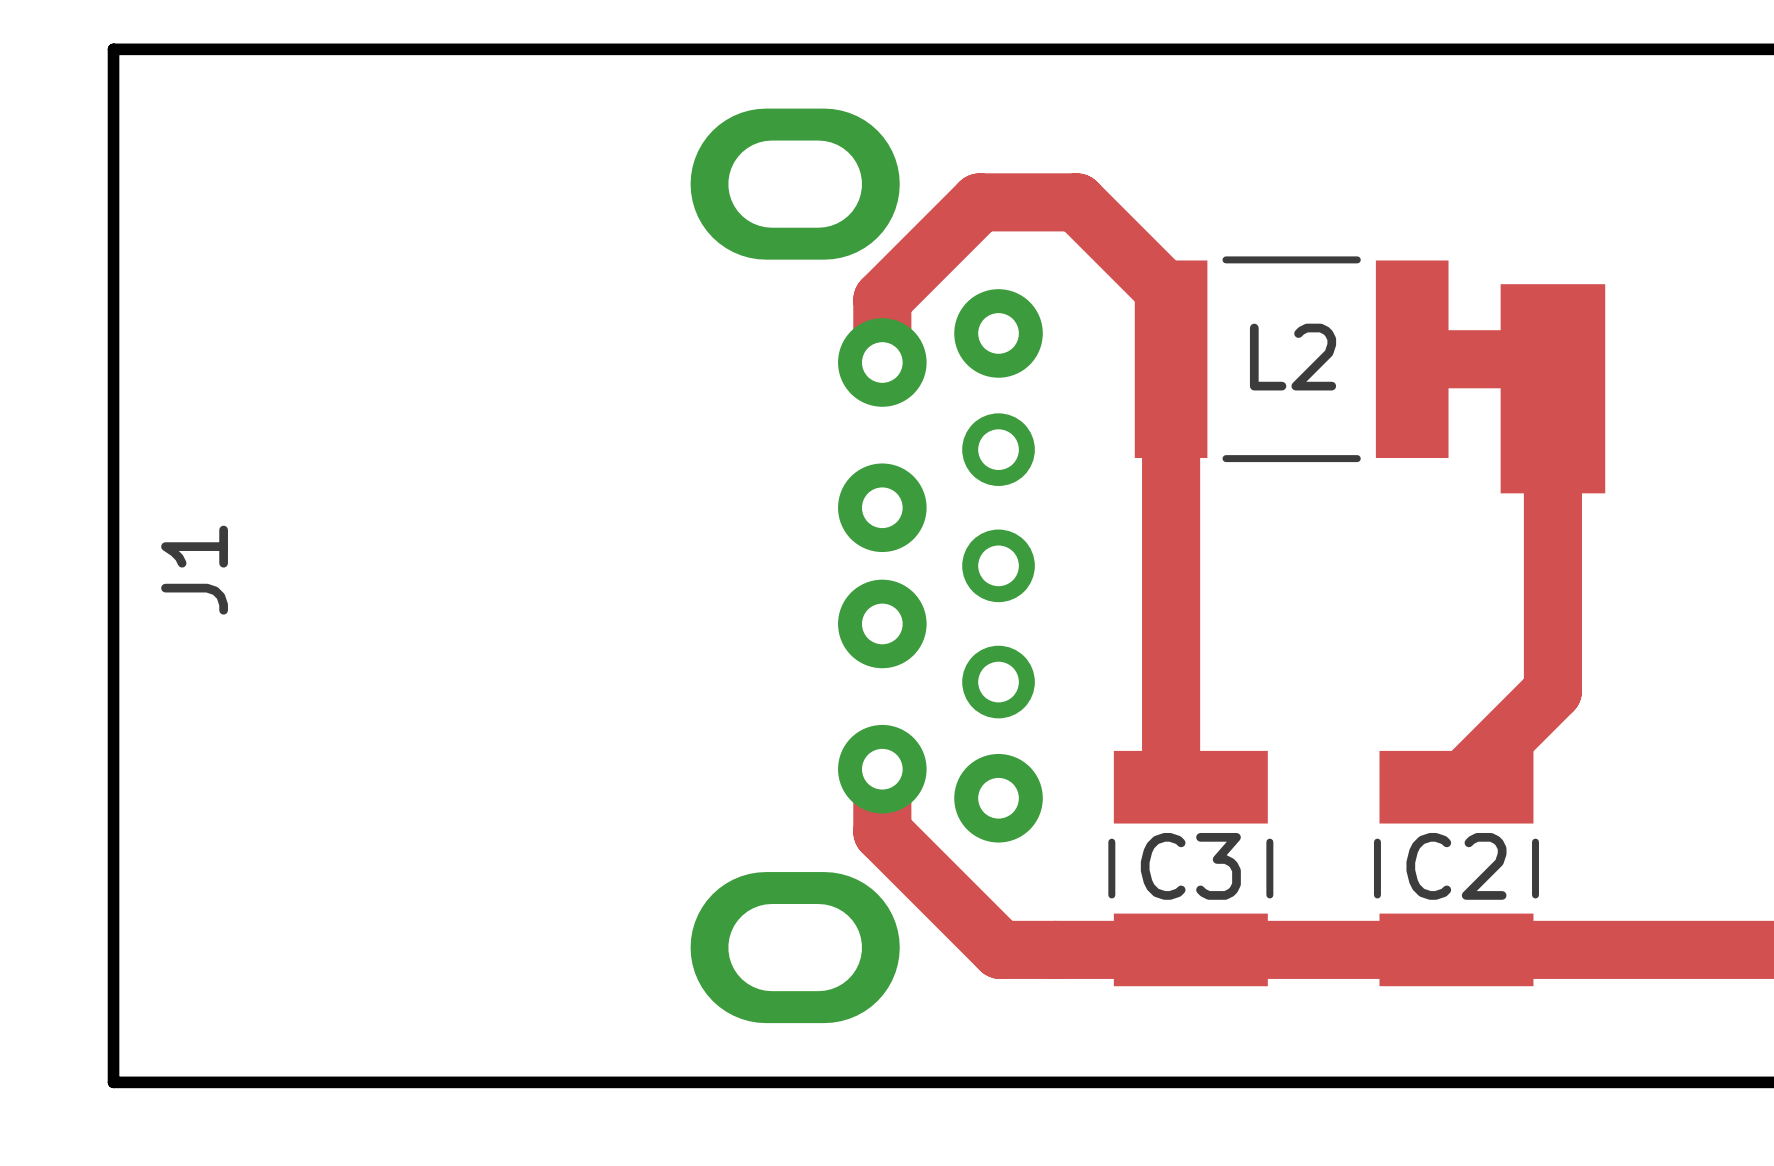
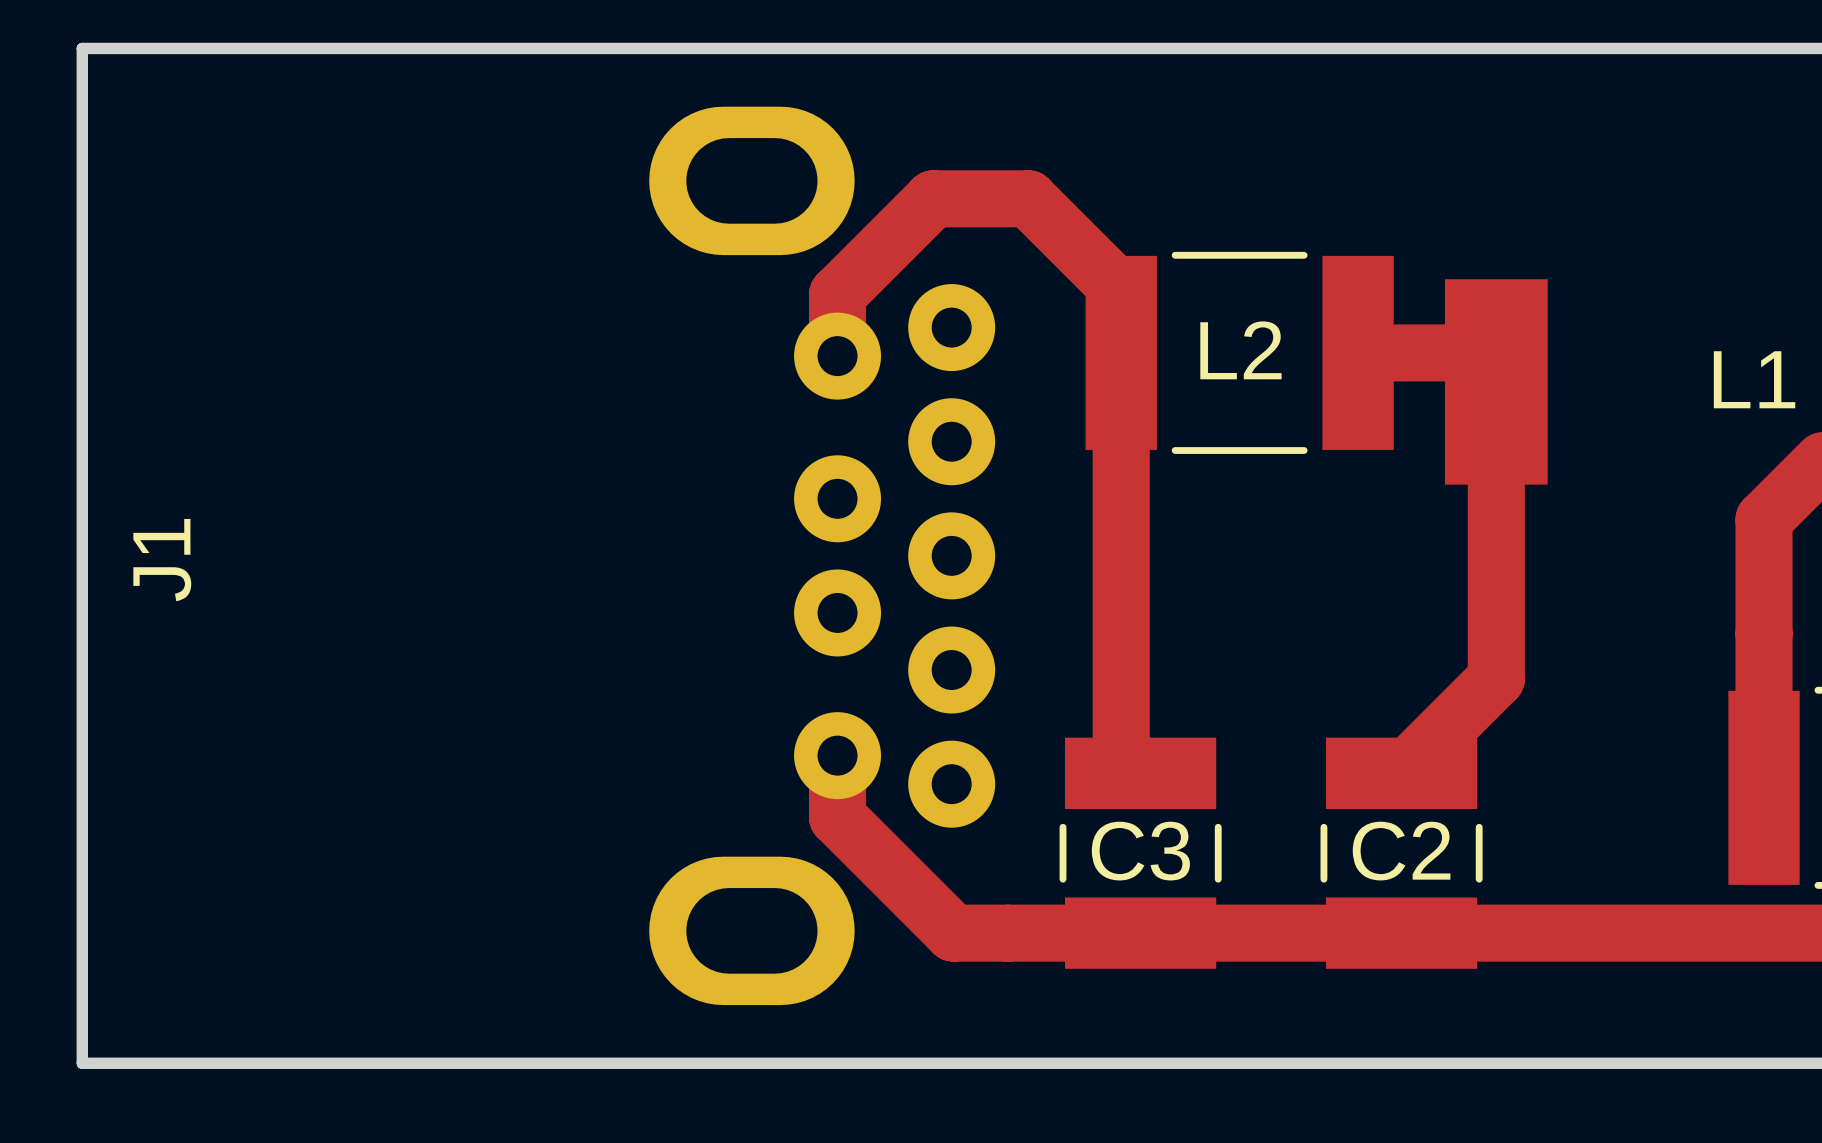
J1 footprint: [690, 108, 1043, 1024] -> [649, 106, 996, 1006]

